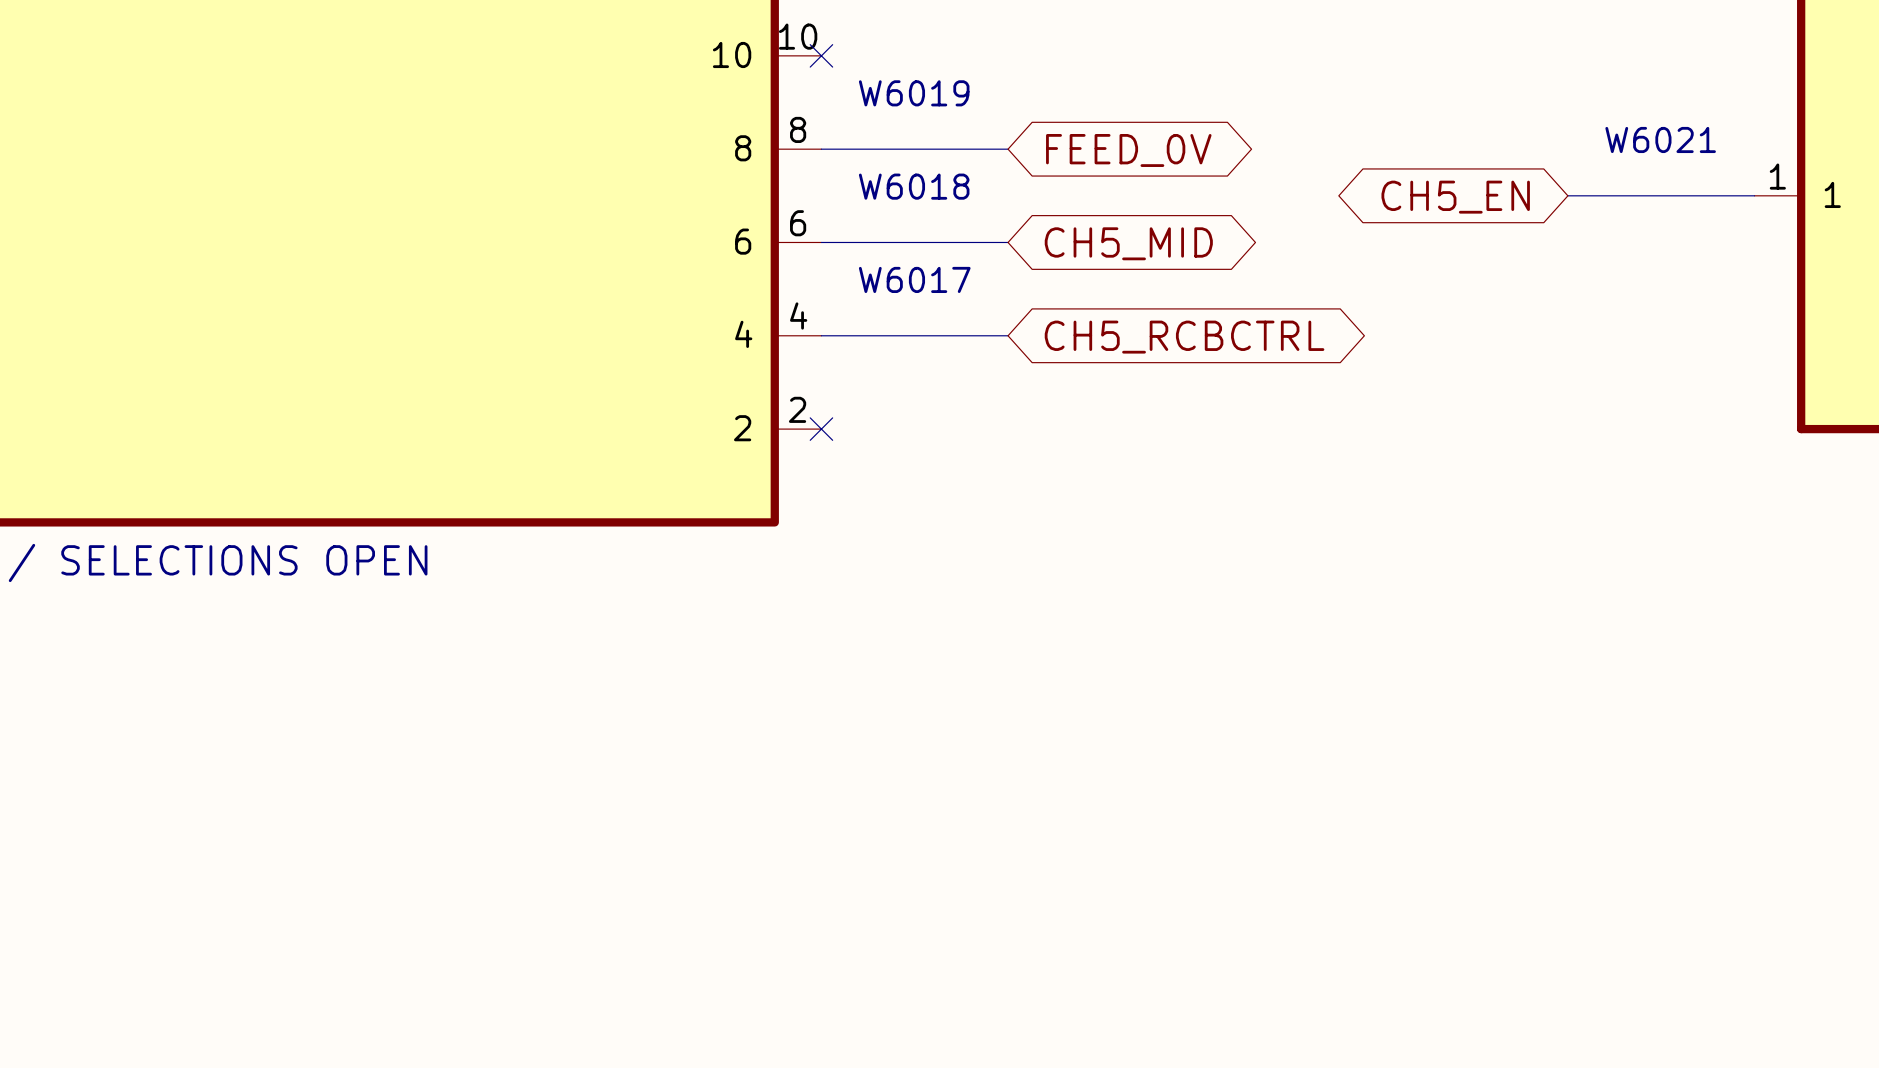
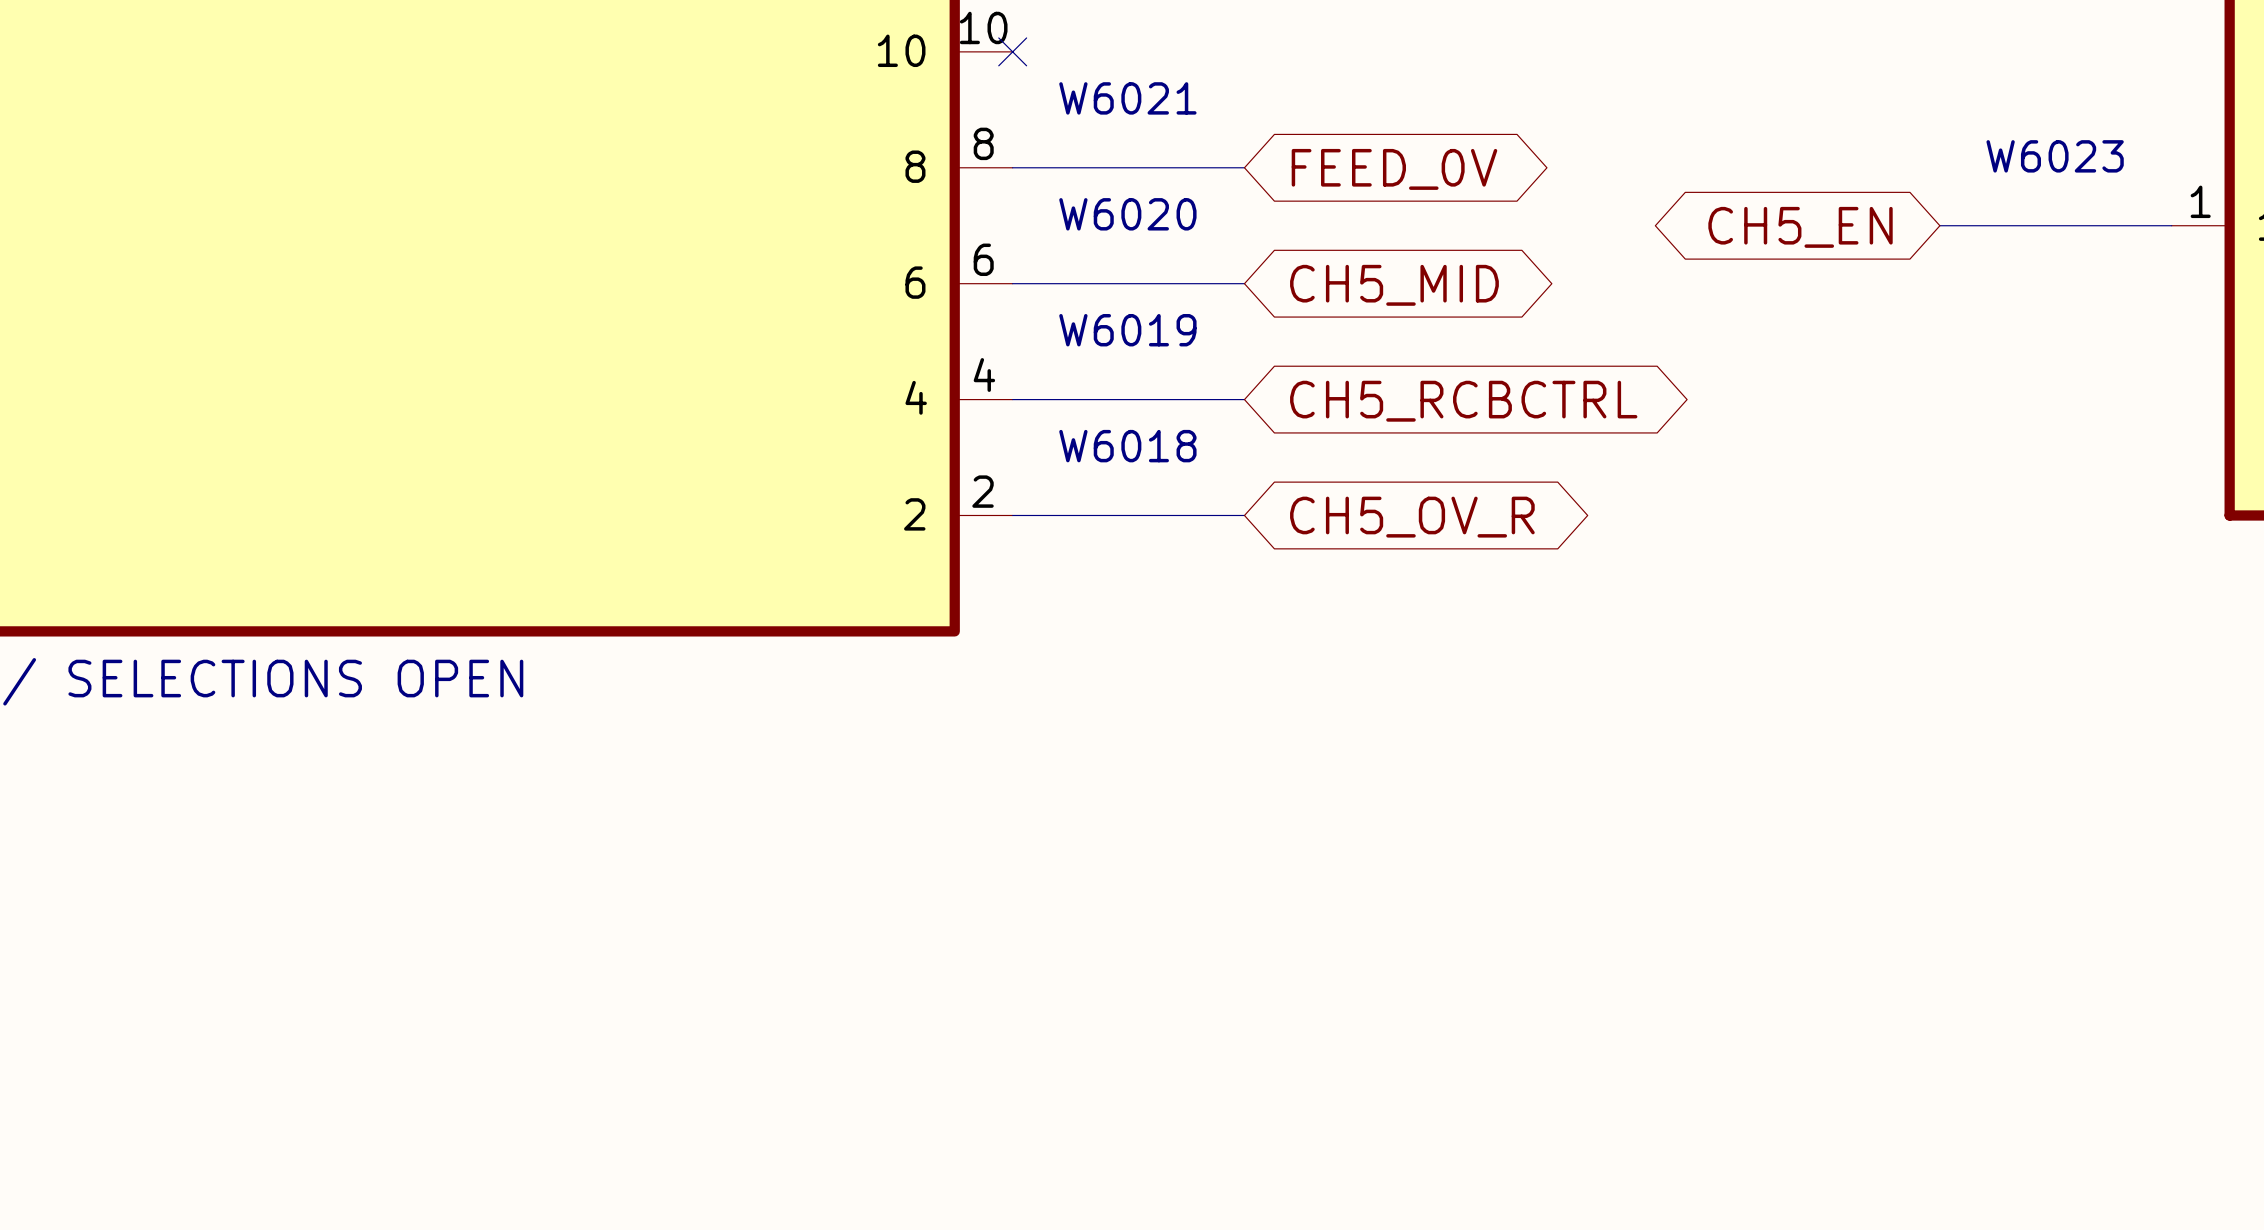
text: W6019 (914, 93) -> W6021 (1127, 98)
text: W6021 (1660, 139) -> W6023 (2055, 156)
text: W6018 (914, 186) -> W6020 (1127, 214)
text: W6017 (914, 279) -> W6019 (1127, 330)
text: none -> W6018 (1127, 446)
wire: none -> (1012, 515) (1244, 515)
no-connect mark: (821, 429) -> none
global label: none -> CH5_OV_R (1412, 517)

